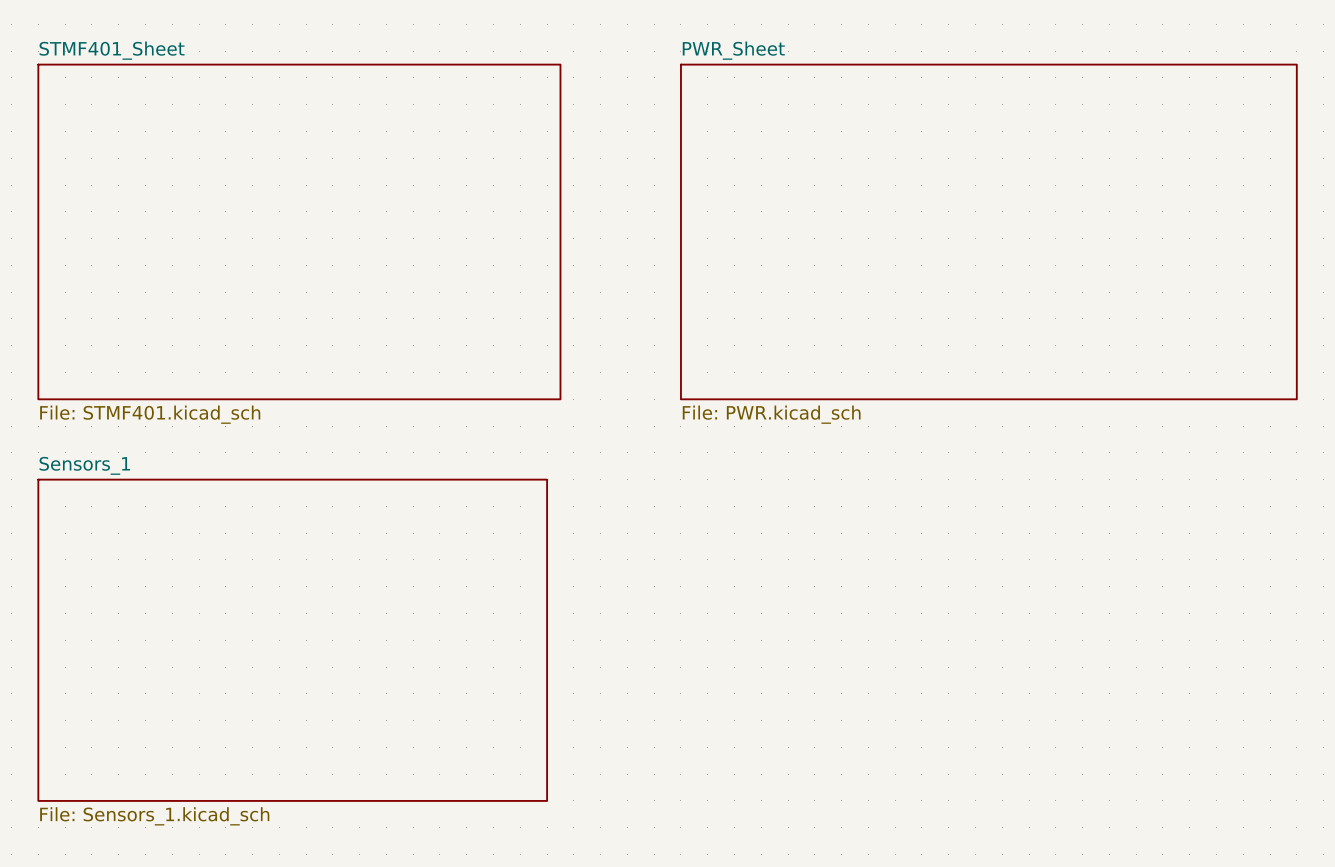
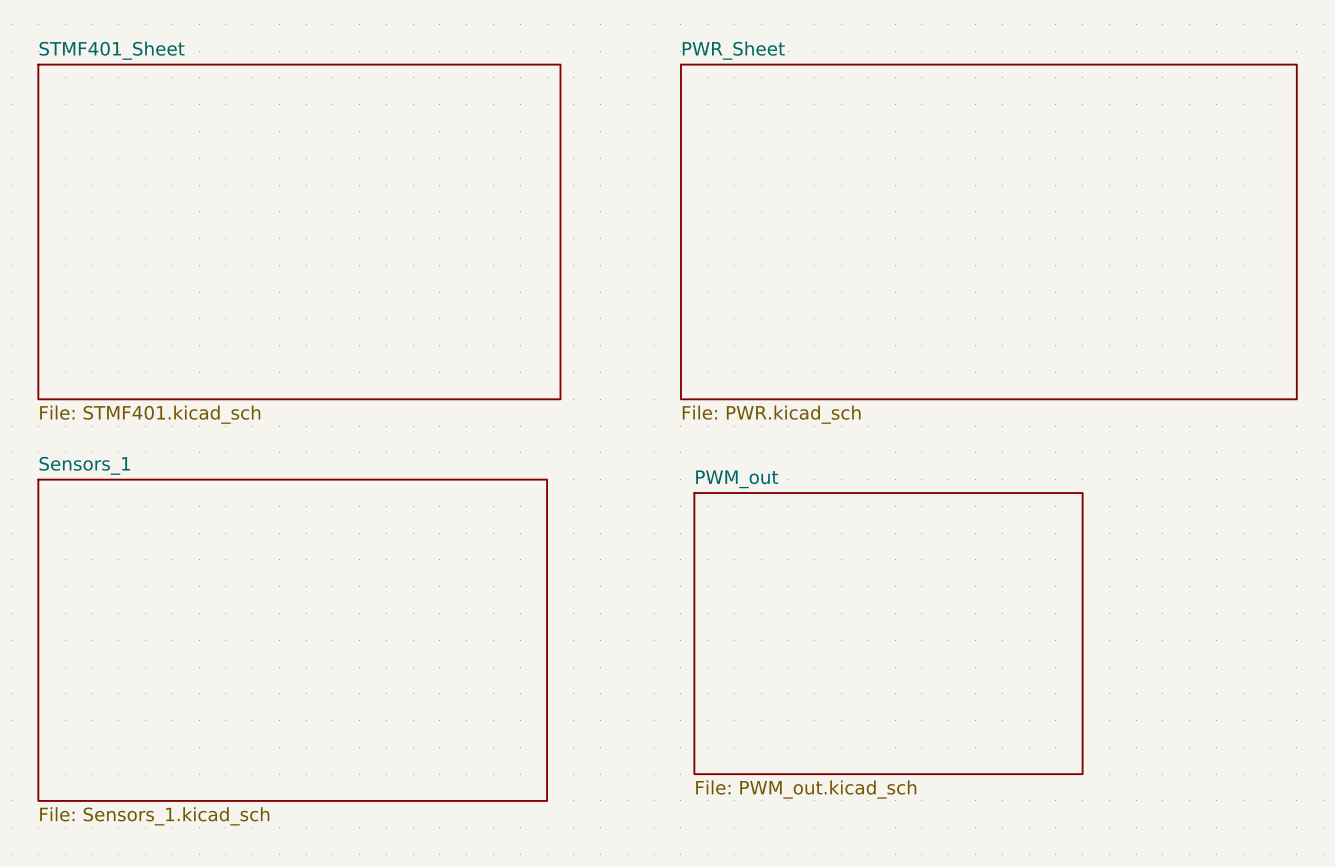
sheet PWM_out: none -> File: PWM_out.kicad_sch (888, 633)

